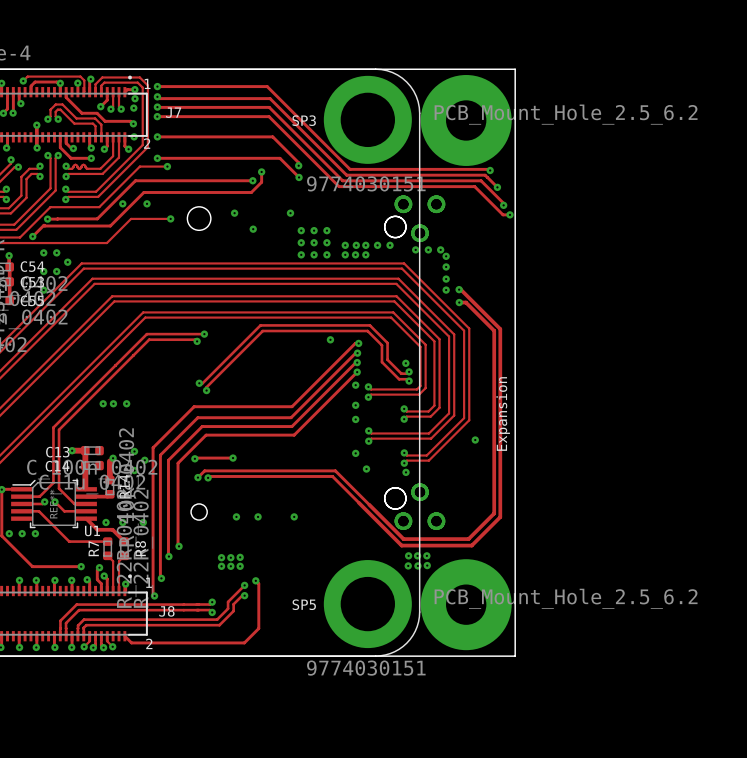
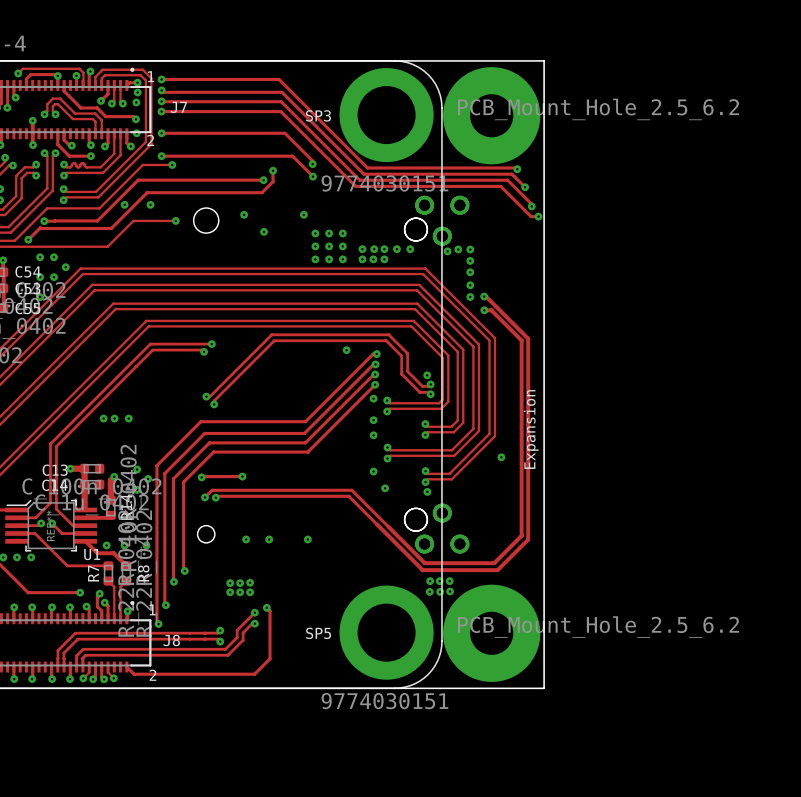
via: none -> (458, 249)
via: none -> (470, 249)
via: none -> (447, 251)
via: (415, 249) -> none
via: (428, 249) -> none
via: (440, 249) -> none

